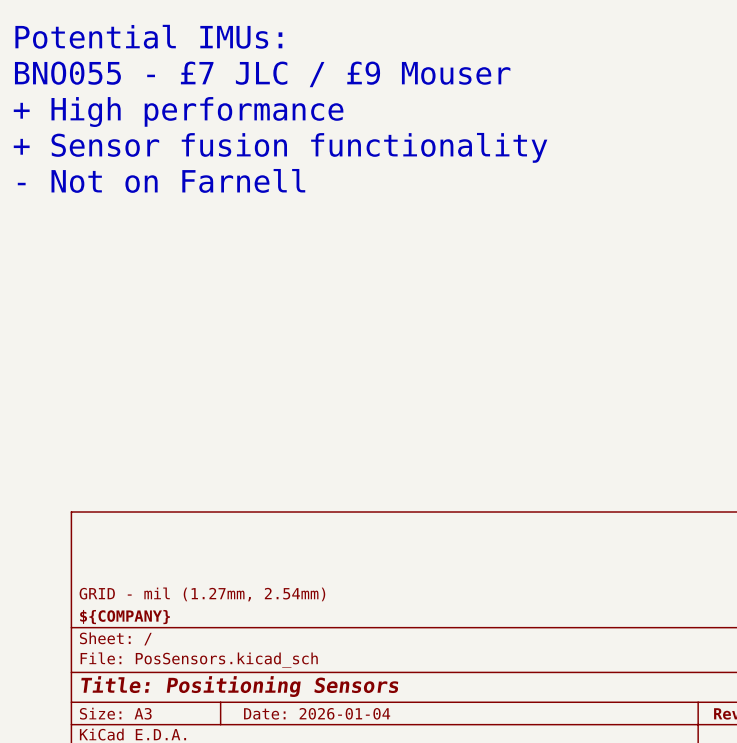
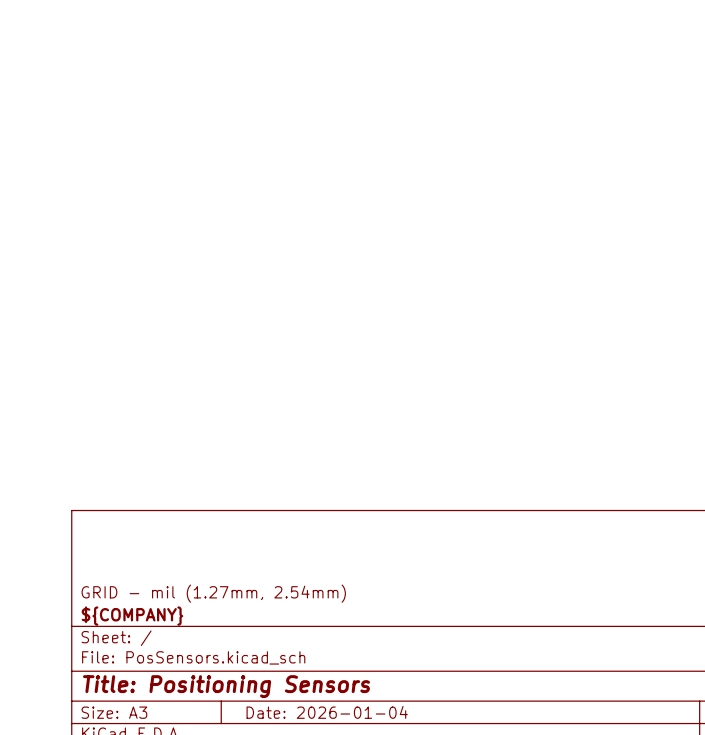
text: Potential IMUs: (148, 36) -> none
text: BNO055 - £7 JLC / £9 Mouser (262, 74) -> none
text: + High performance (178, 112) -> none
text: + Sensor fusion functionality (280, 147) -> none
text: - Not on Farnell (161, 180) -> none

